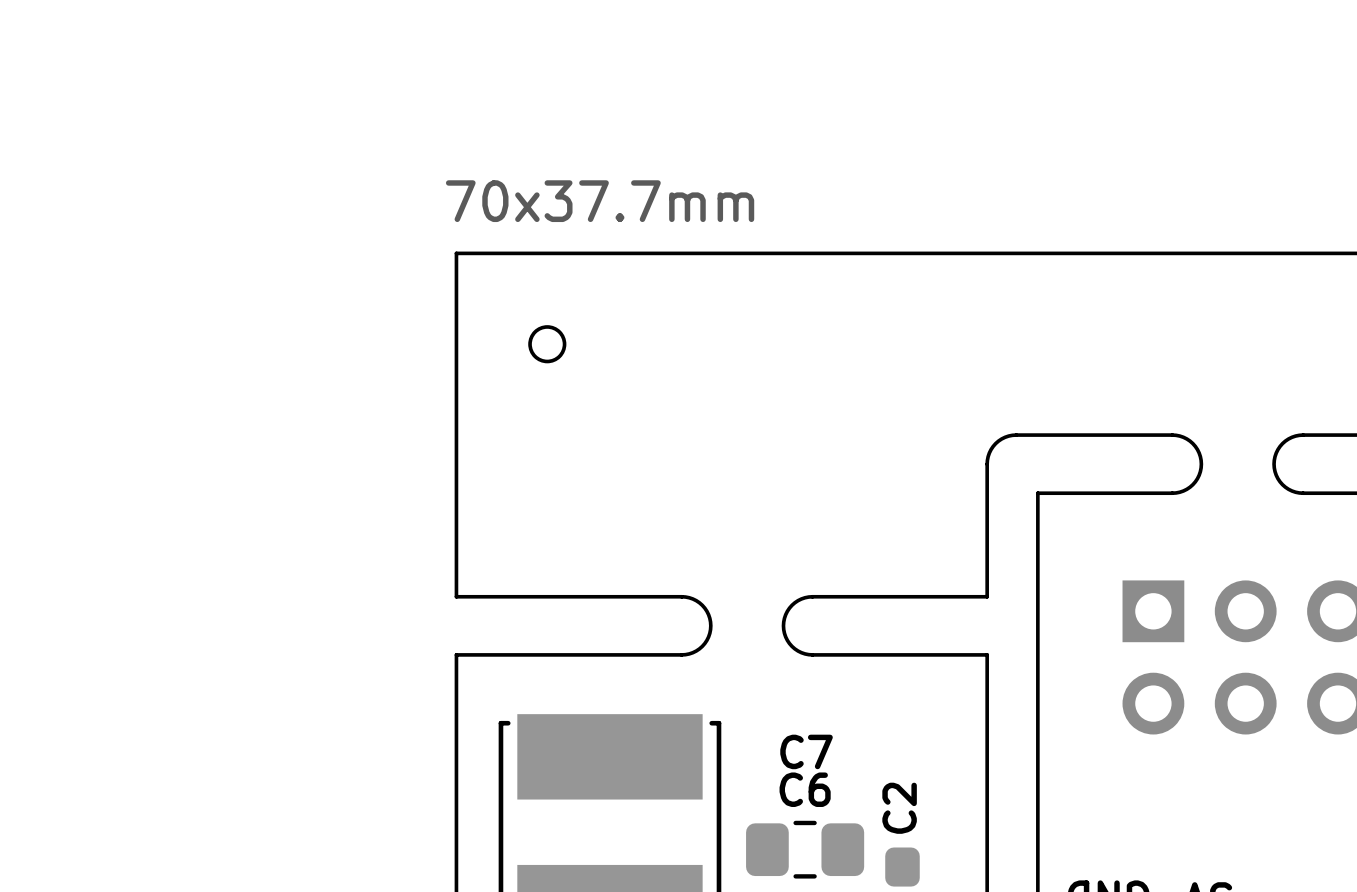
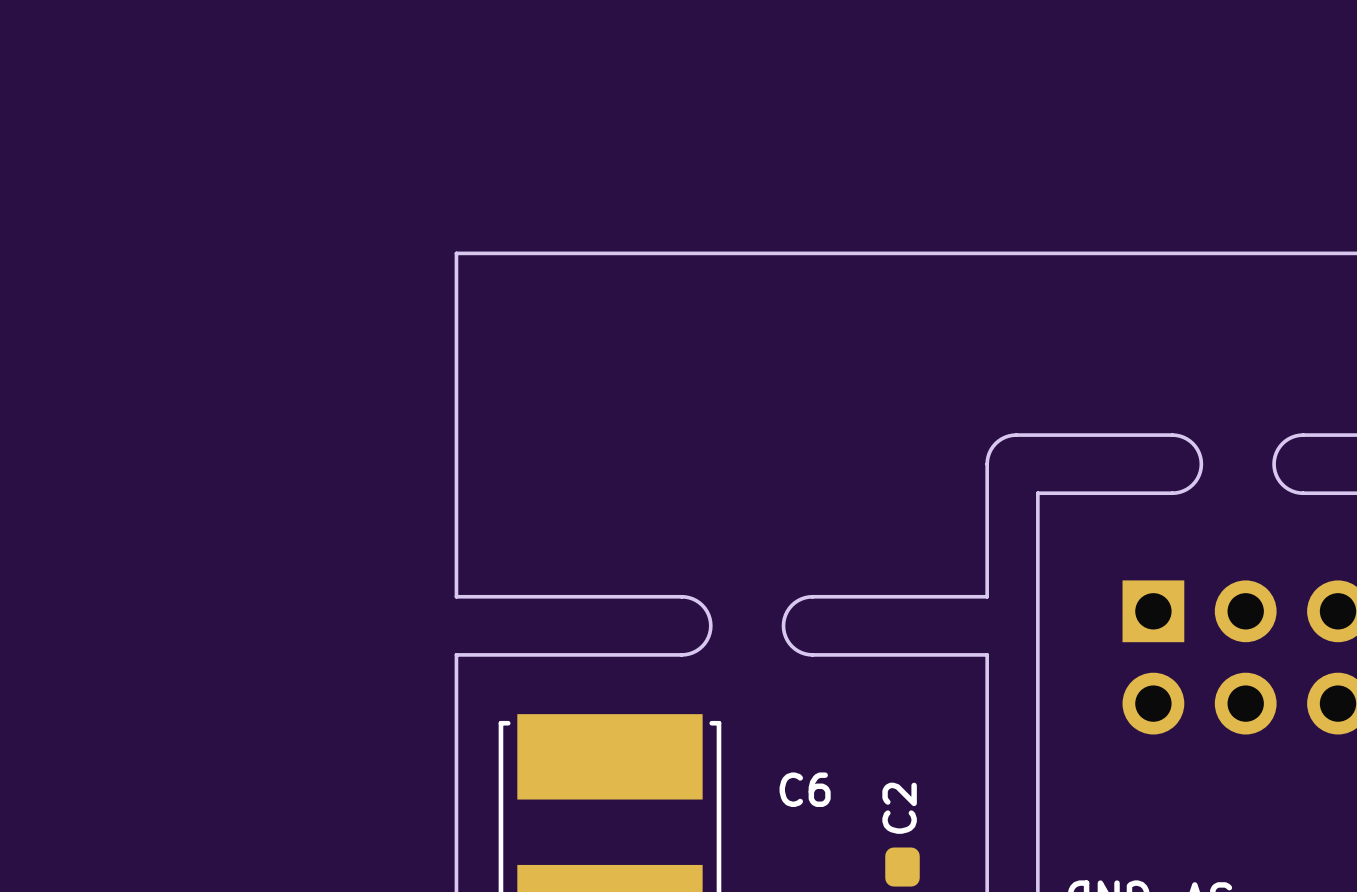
text: 70x37.7mm (600, 201) -> none
round board edge: [528, 325, 567, 364] -> none
C7: (805, 849) -> none

